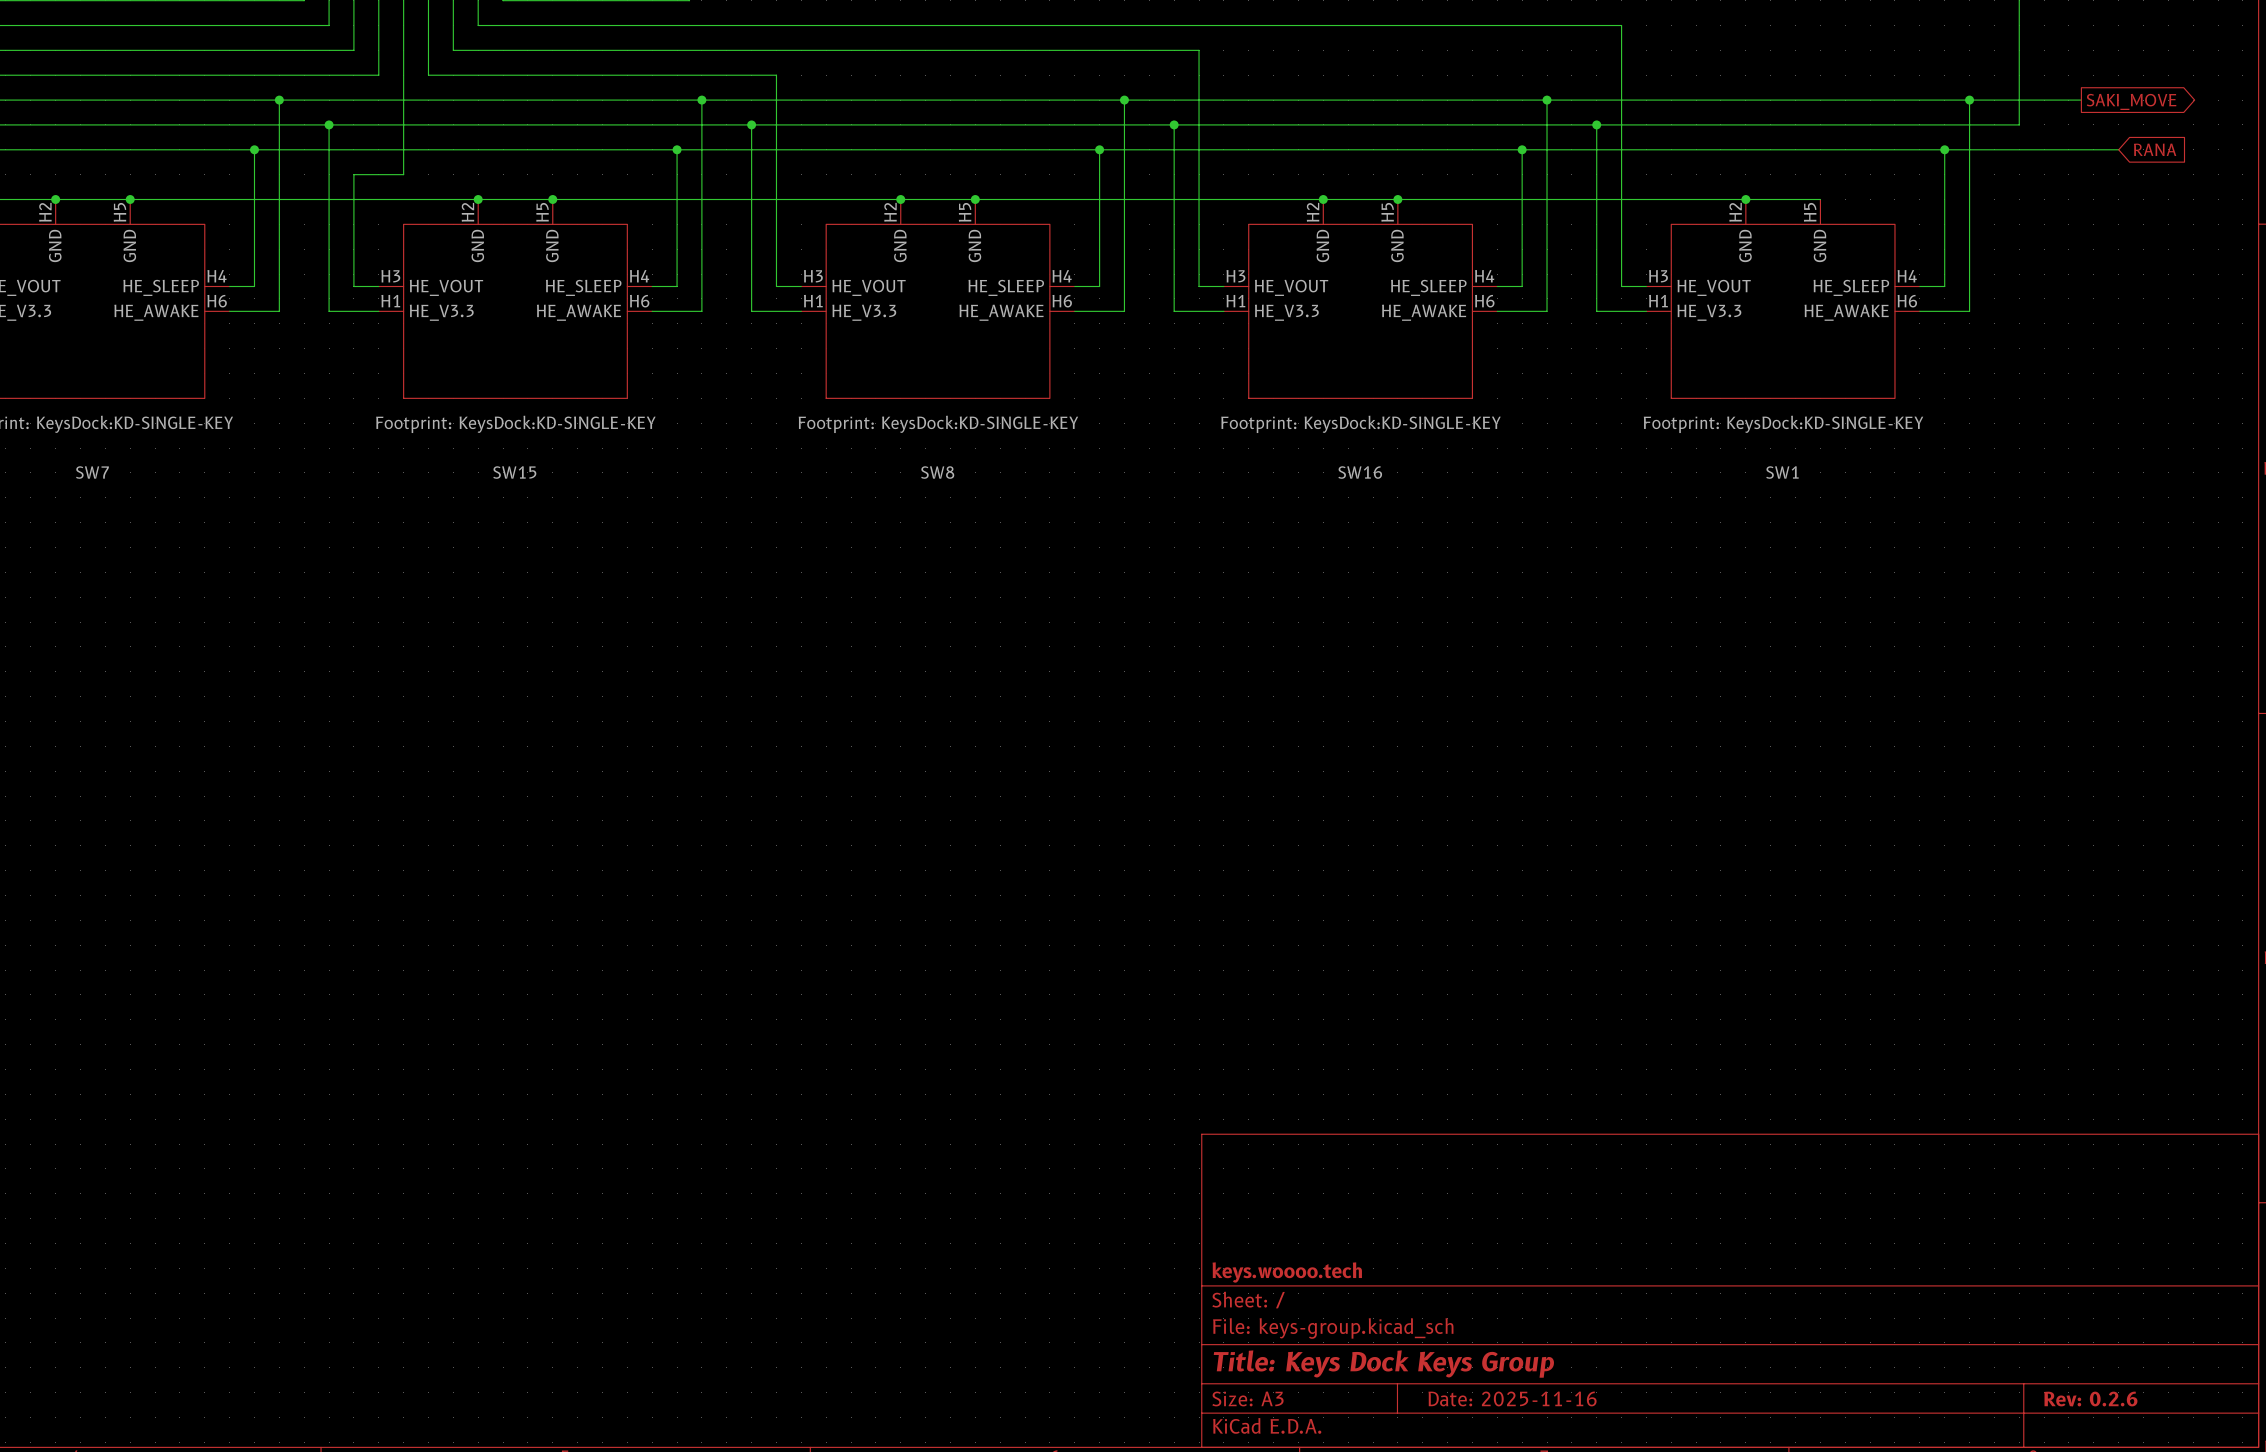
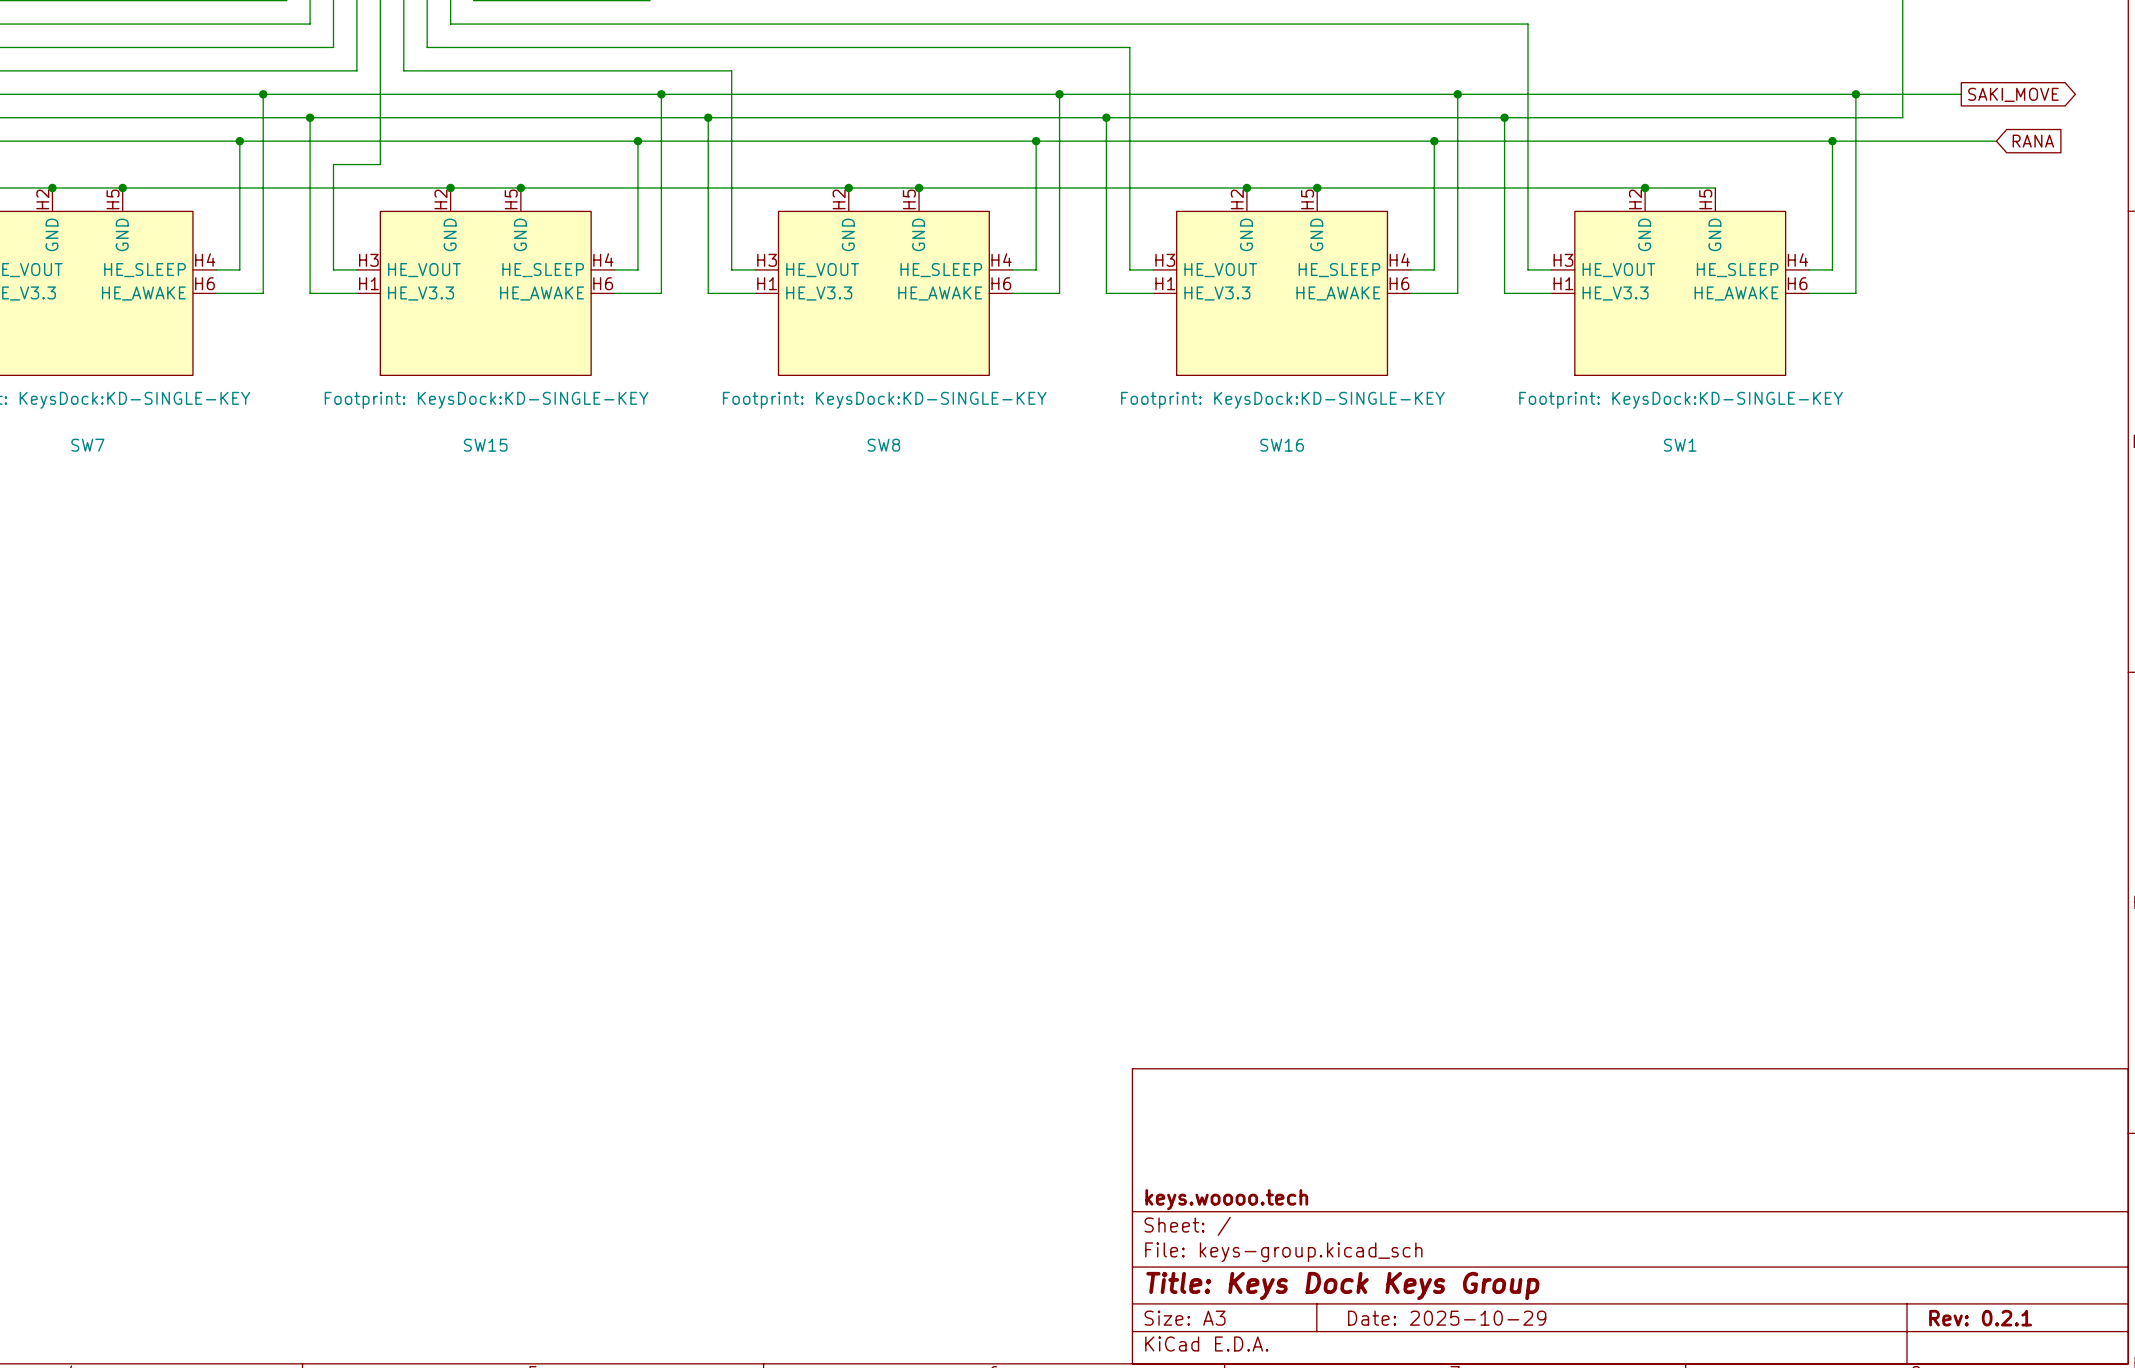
title block: Date: 2025-11-16 (1512, 1398) -> Date: 2025-10-29 (1447, 1318)
title block: Rev: 0.2.6 (2090, 1399) -> Rev: 0.2.1 (1980, 1318)

